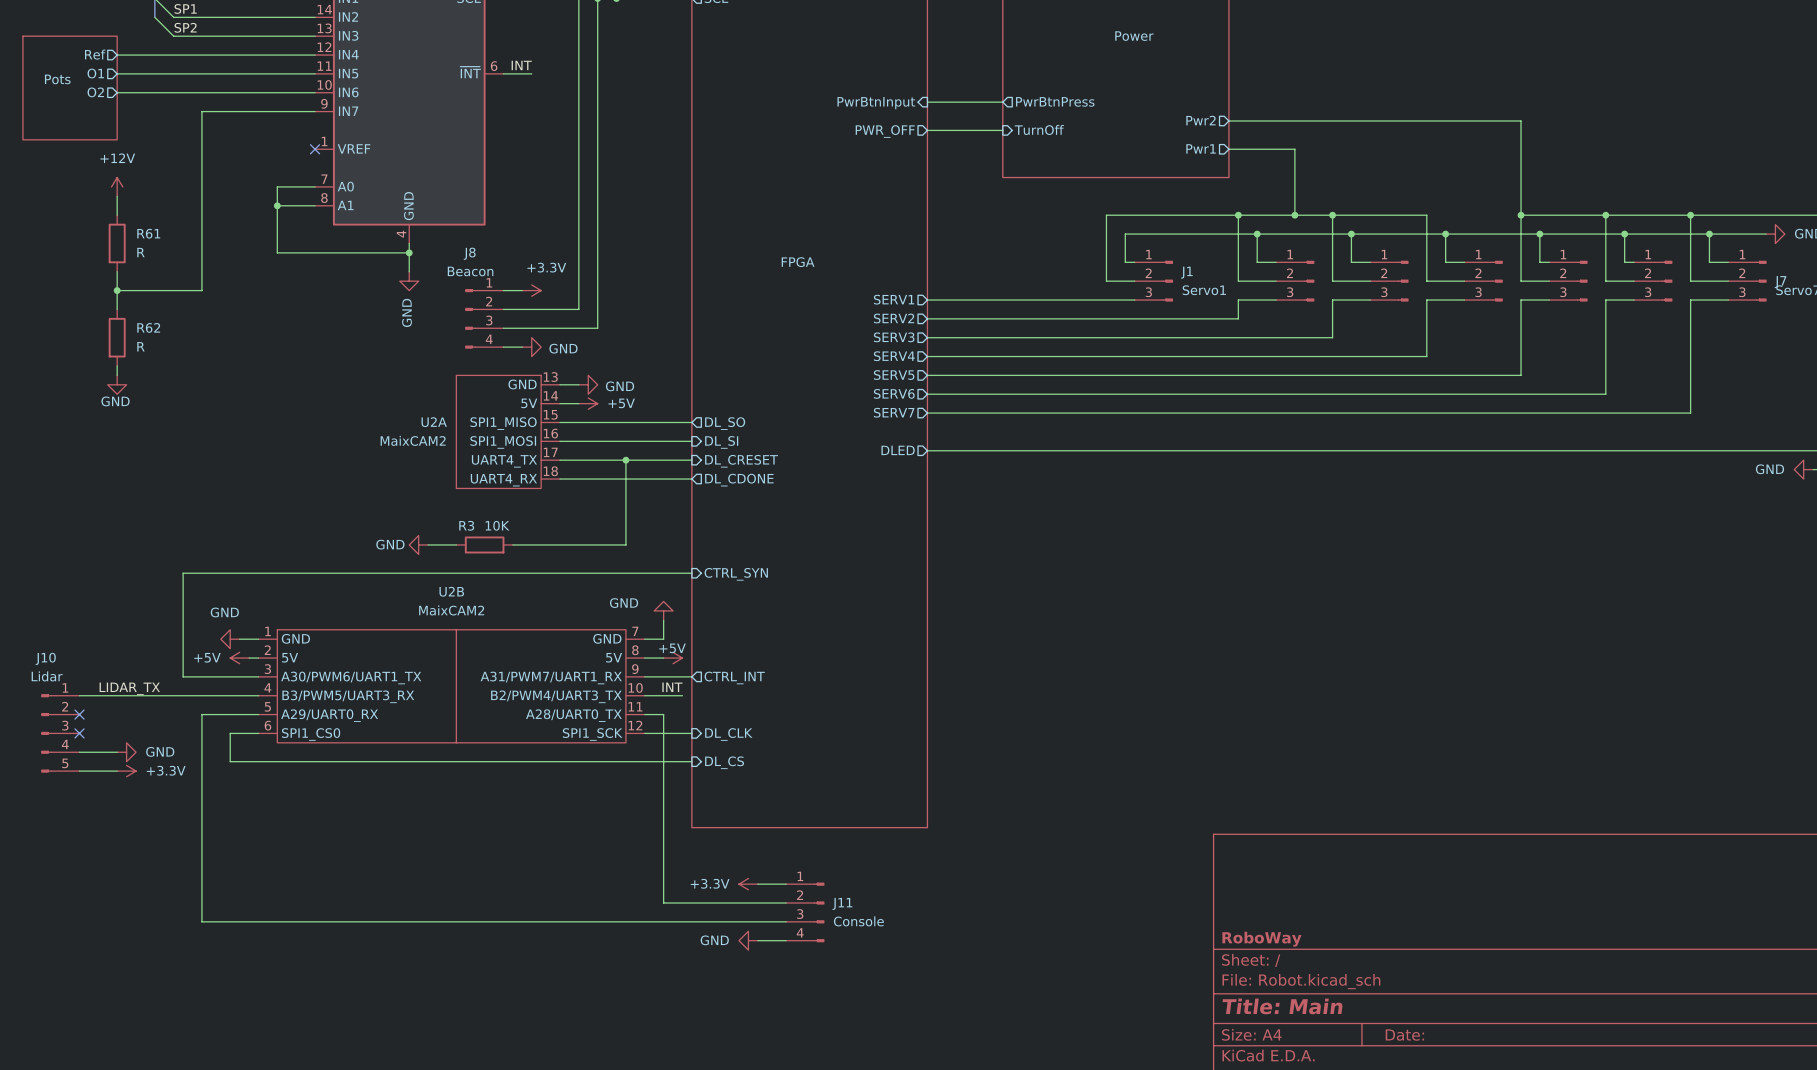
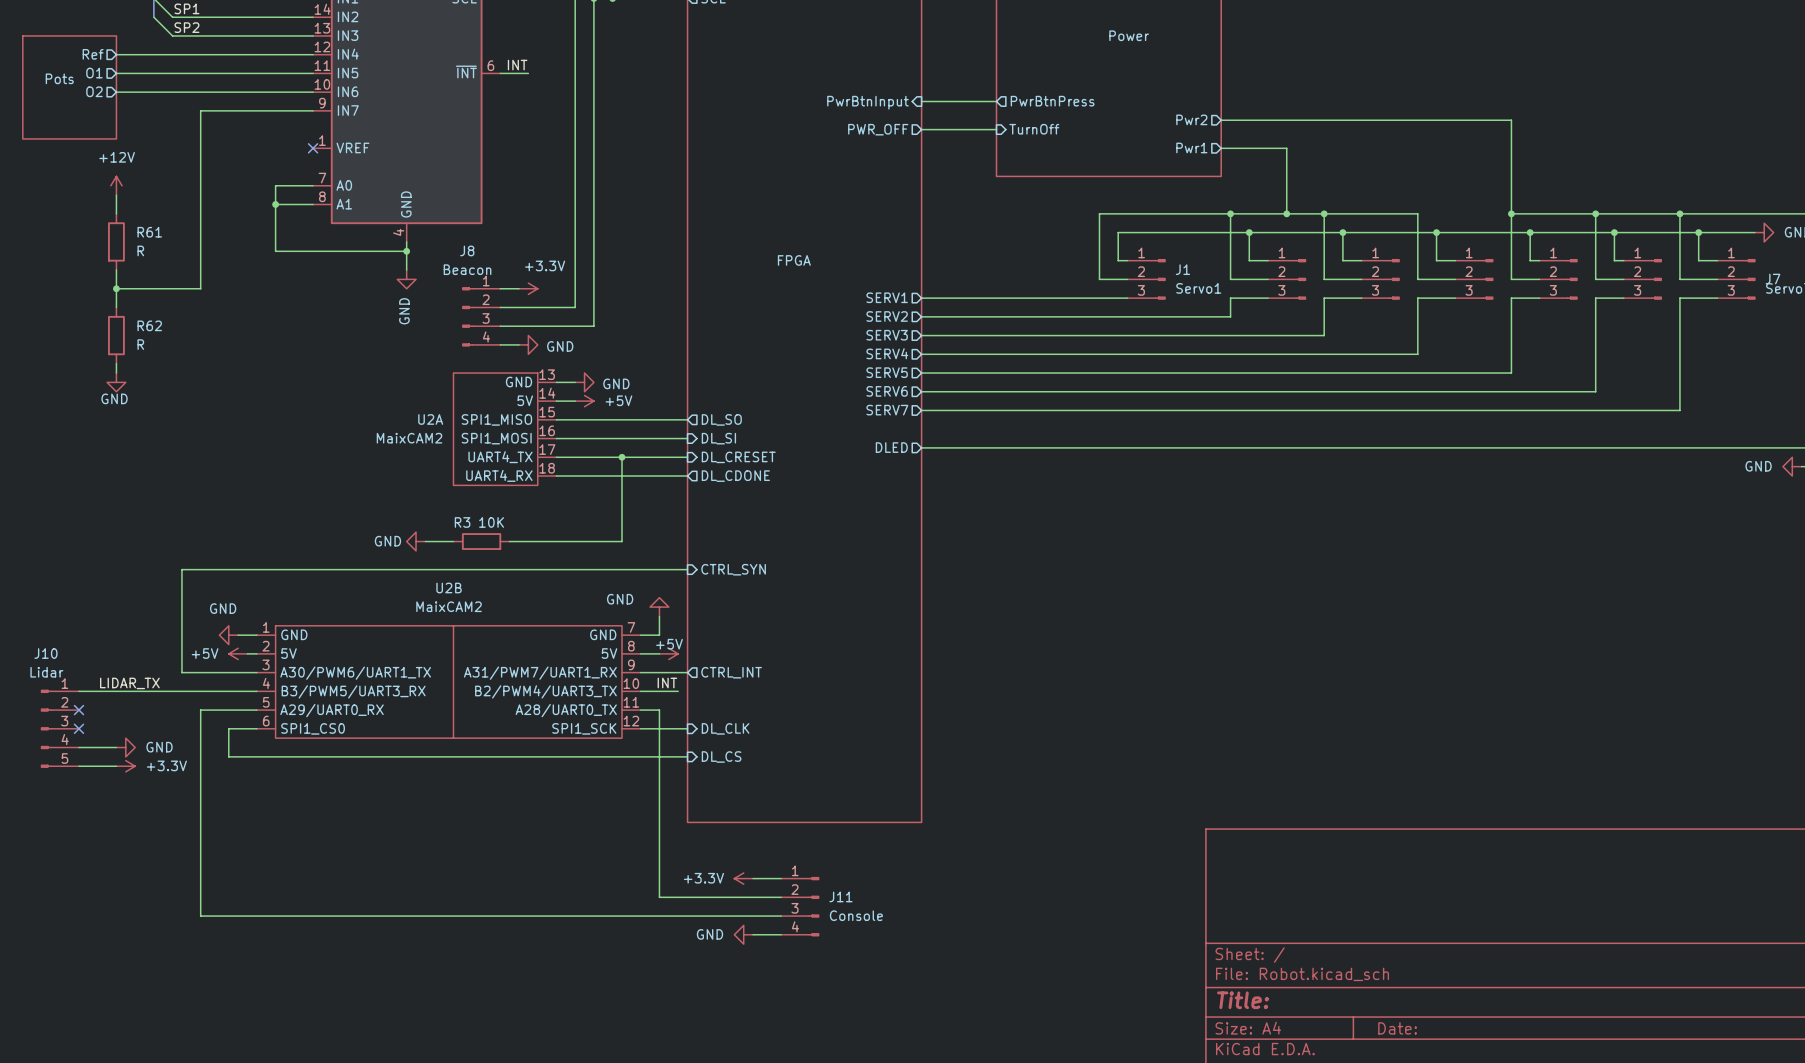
title block: RoboWay (1261, 939) -> none
title block: Title: Main (1282, 1006) -> Title: (1243, 1000)

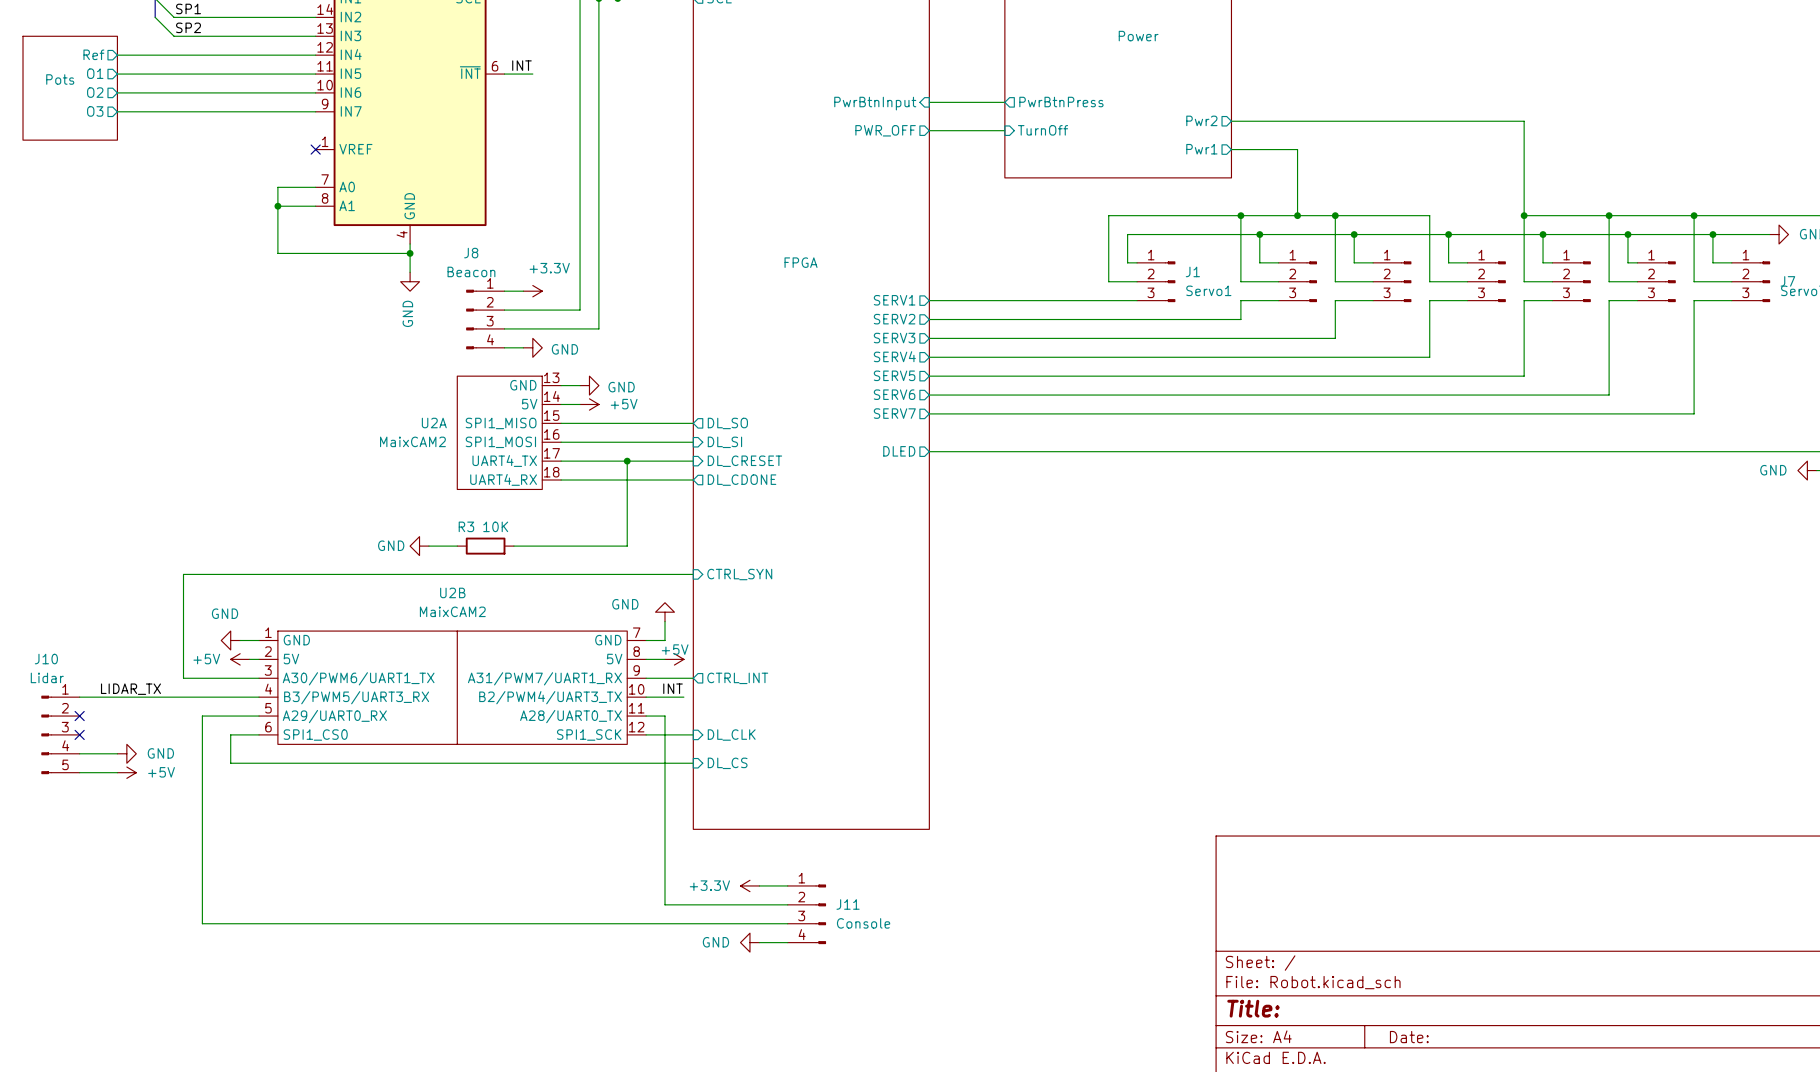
sheet pin: none -> O3 (95, 111)
wire: (200, 110) (200, 288) (116, 288) -> (202, 111) (117, 111)
power symbol: +12V (116, 185) -> none
wire: (116, 195) (116, 213) -> none
R61: R (116, 241) -> none
wire: (116, 270) (116, 307) -> none
junction: (116, 288) -> none
R62: R (116, 335) -> none
wire: (116, 363) (116, 373) -> none
power symbol: GND (116, 382) -> none
power symbol: +3.3V (125, 766) -> +5V (126, 772)

